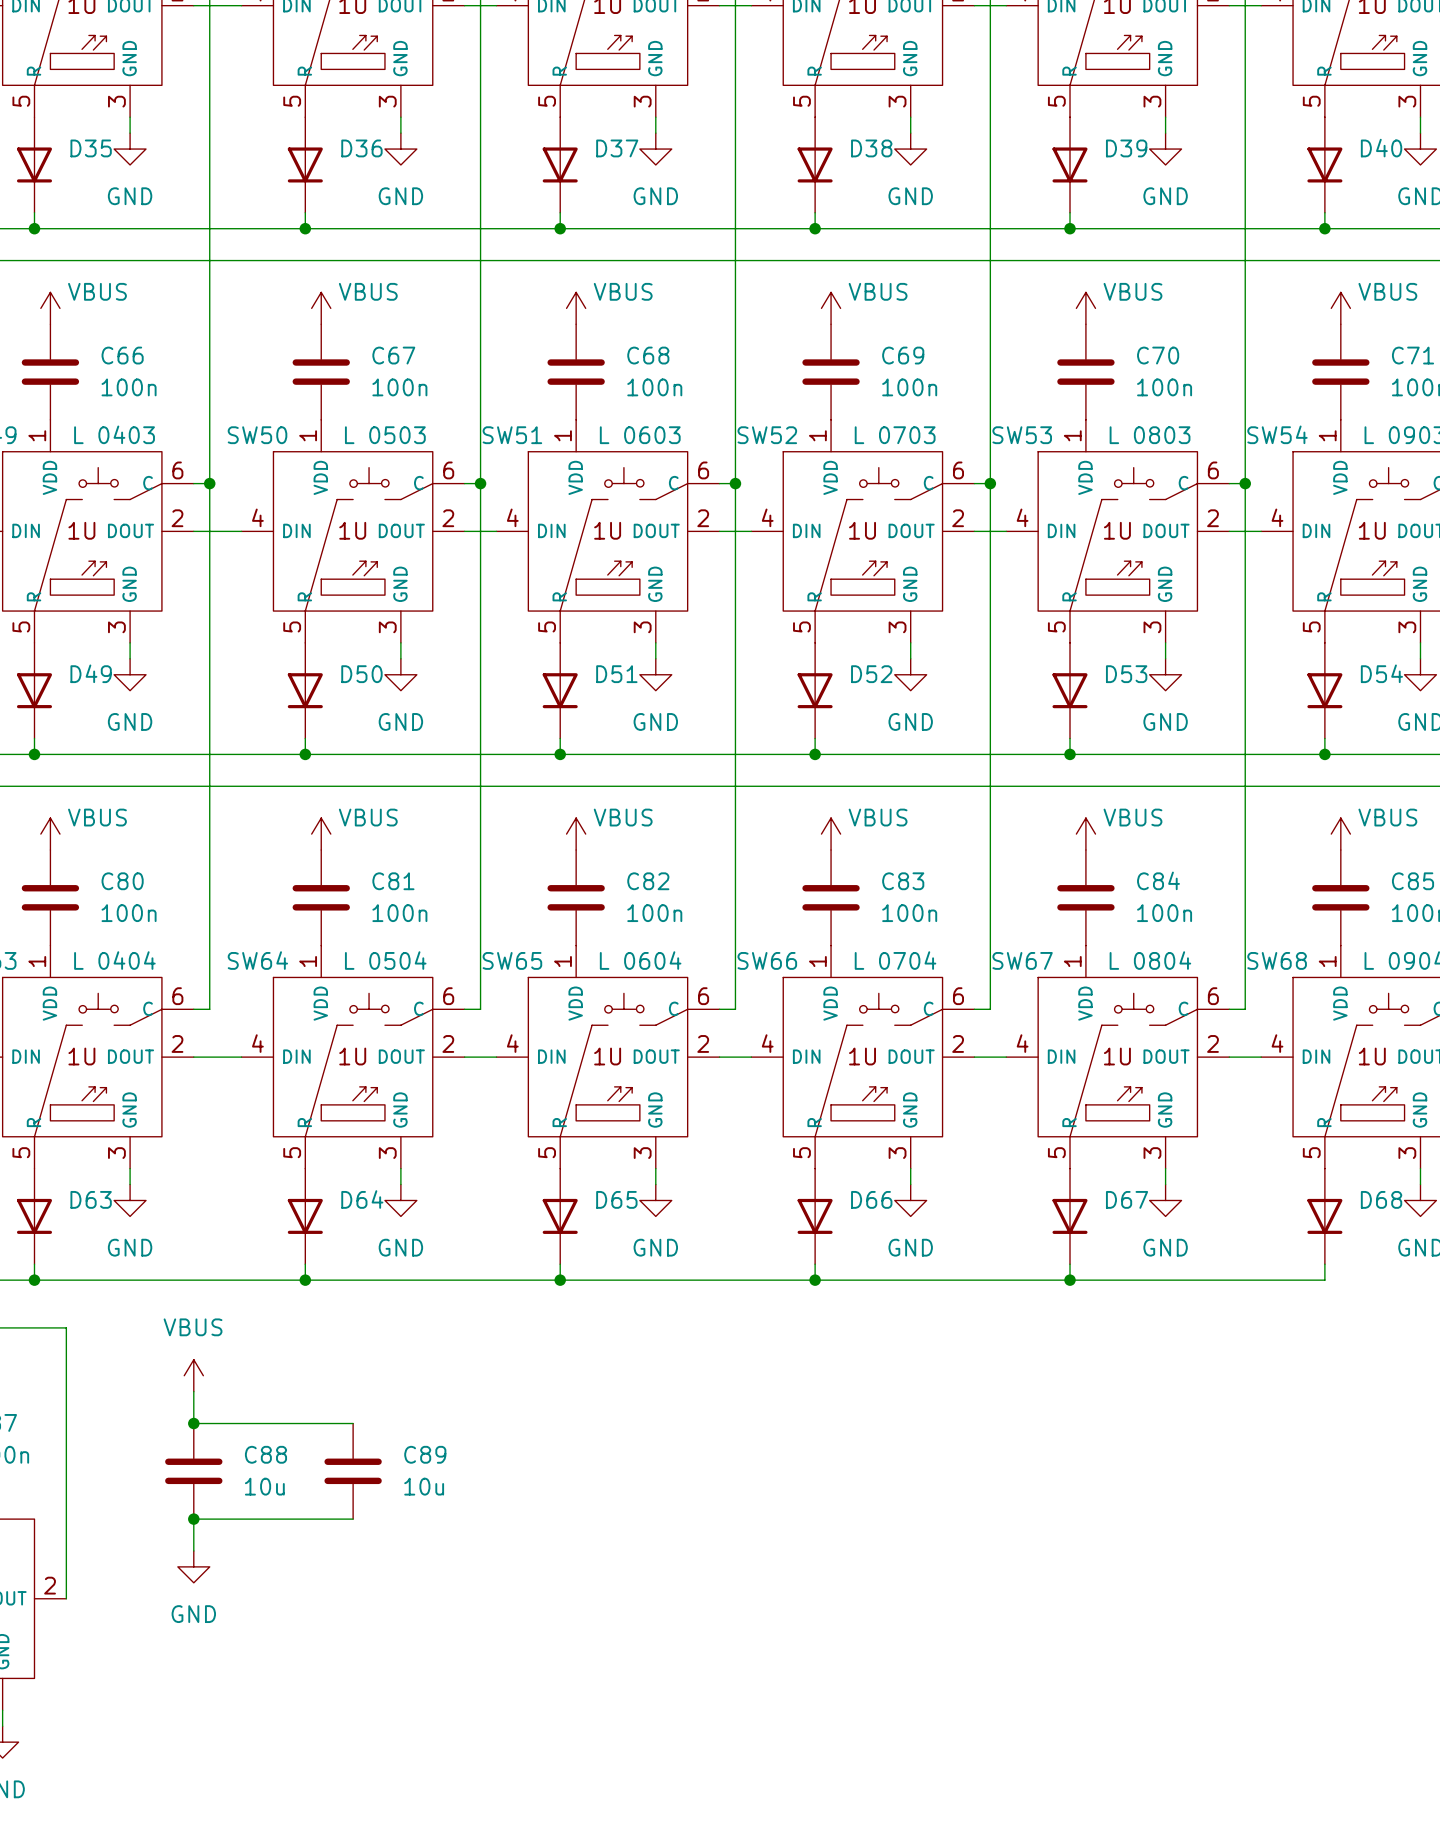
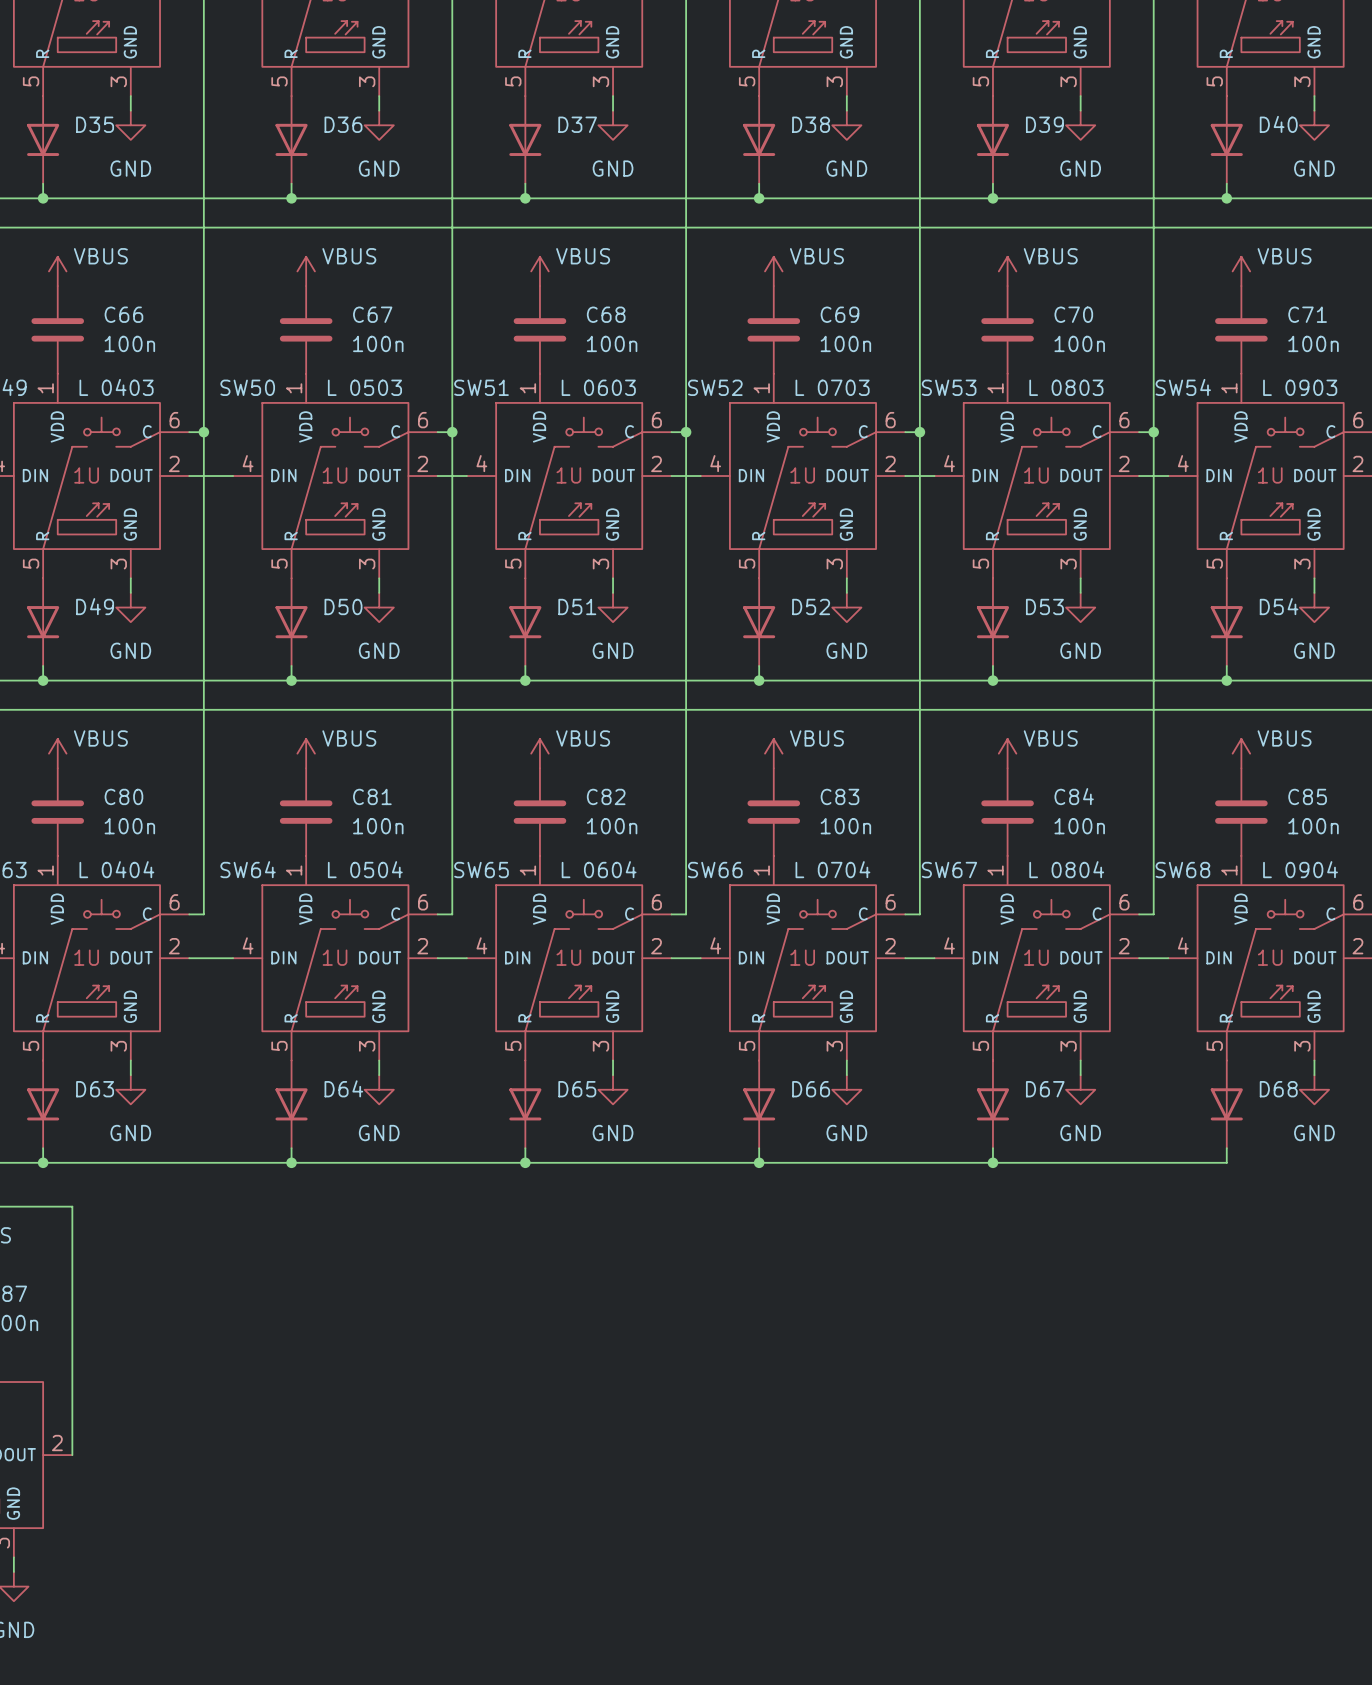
power symbol: VBUS (193, 1375) -> none
wire: (193, 1391) (193, 1423) (353, 1423) -> none
junction: (193, 1423) -> none
C88: 10u (193, 1471) -> none
C89: 10u (353, 1471) -> none
junction: (193, 1519) -> none
wire: (353, 1519) (193, 1519) (193, 1550) -> none
power symbol: GND (193, 1566) -> none

